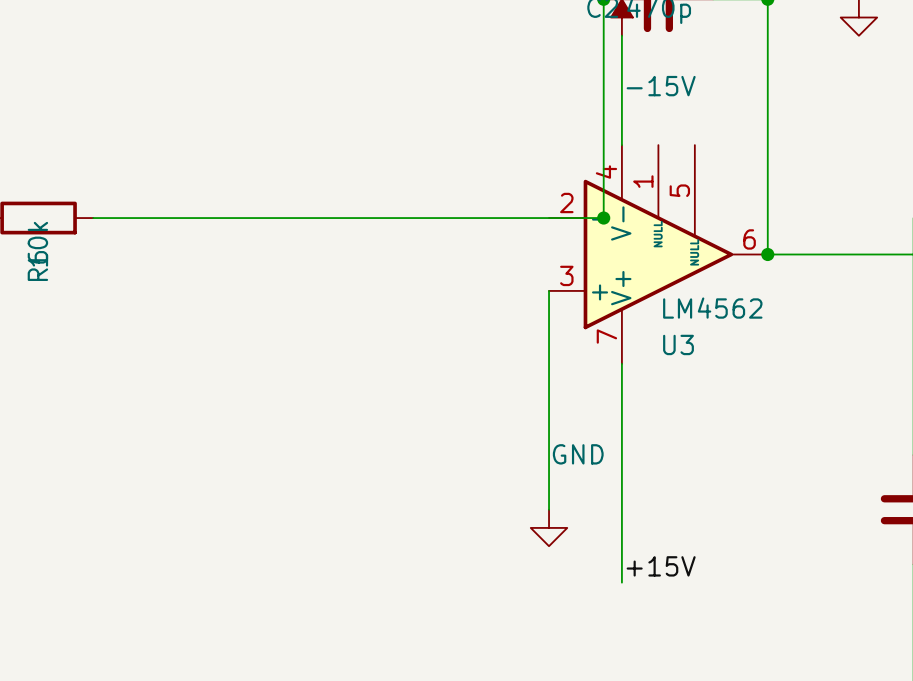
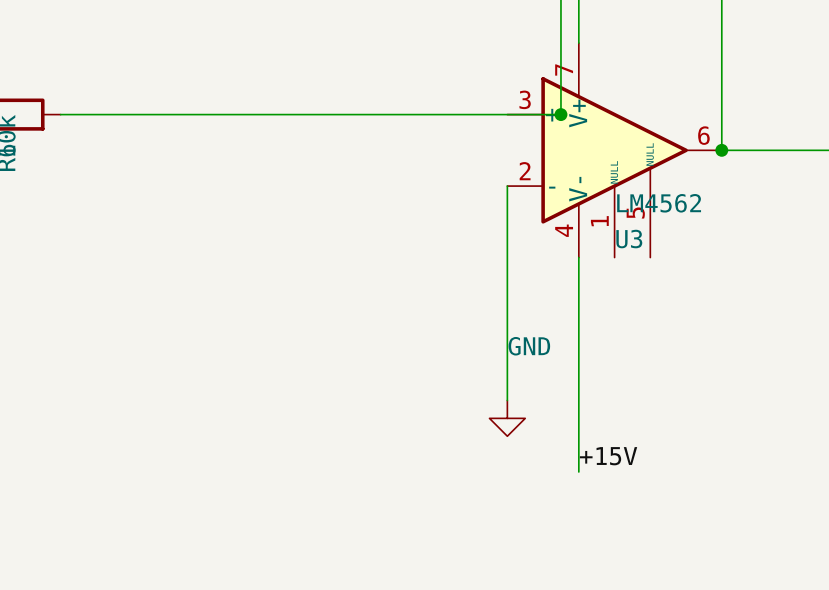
U3 flip: as is (658, 254) -> up-down (614, 150)

